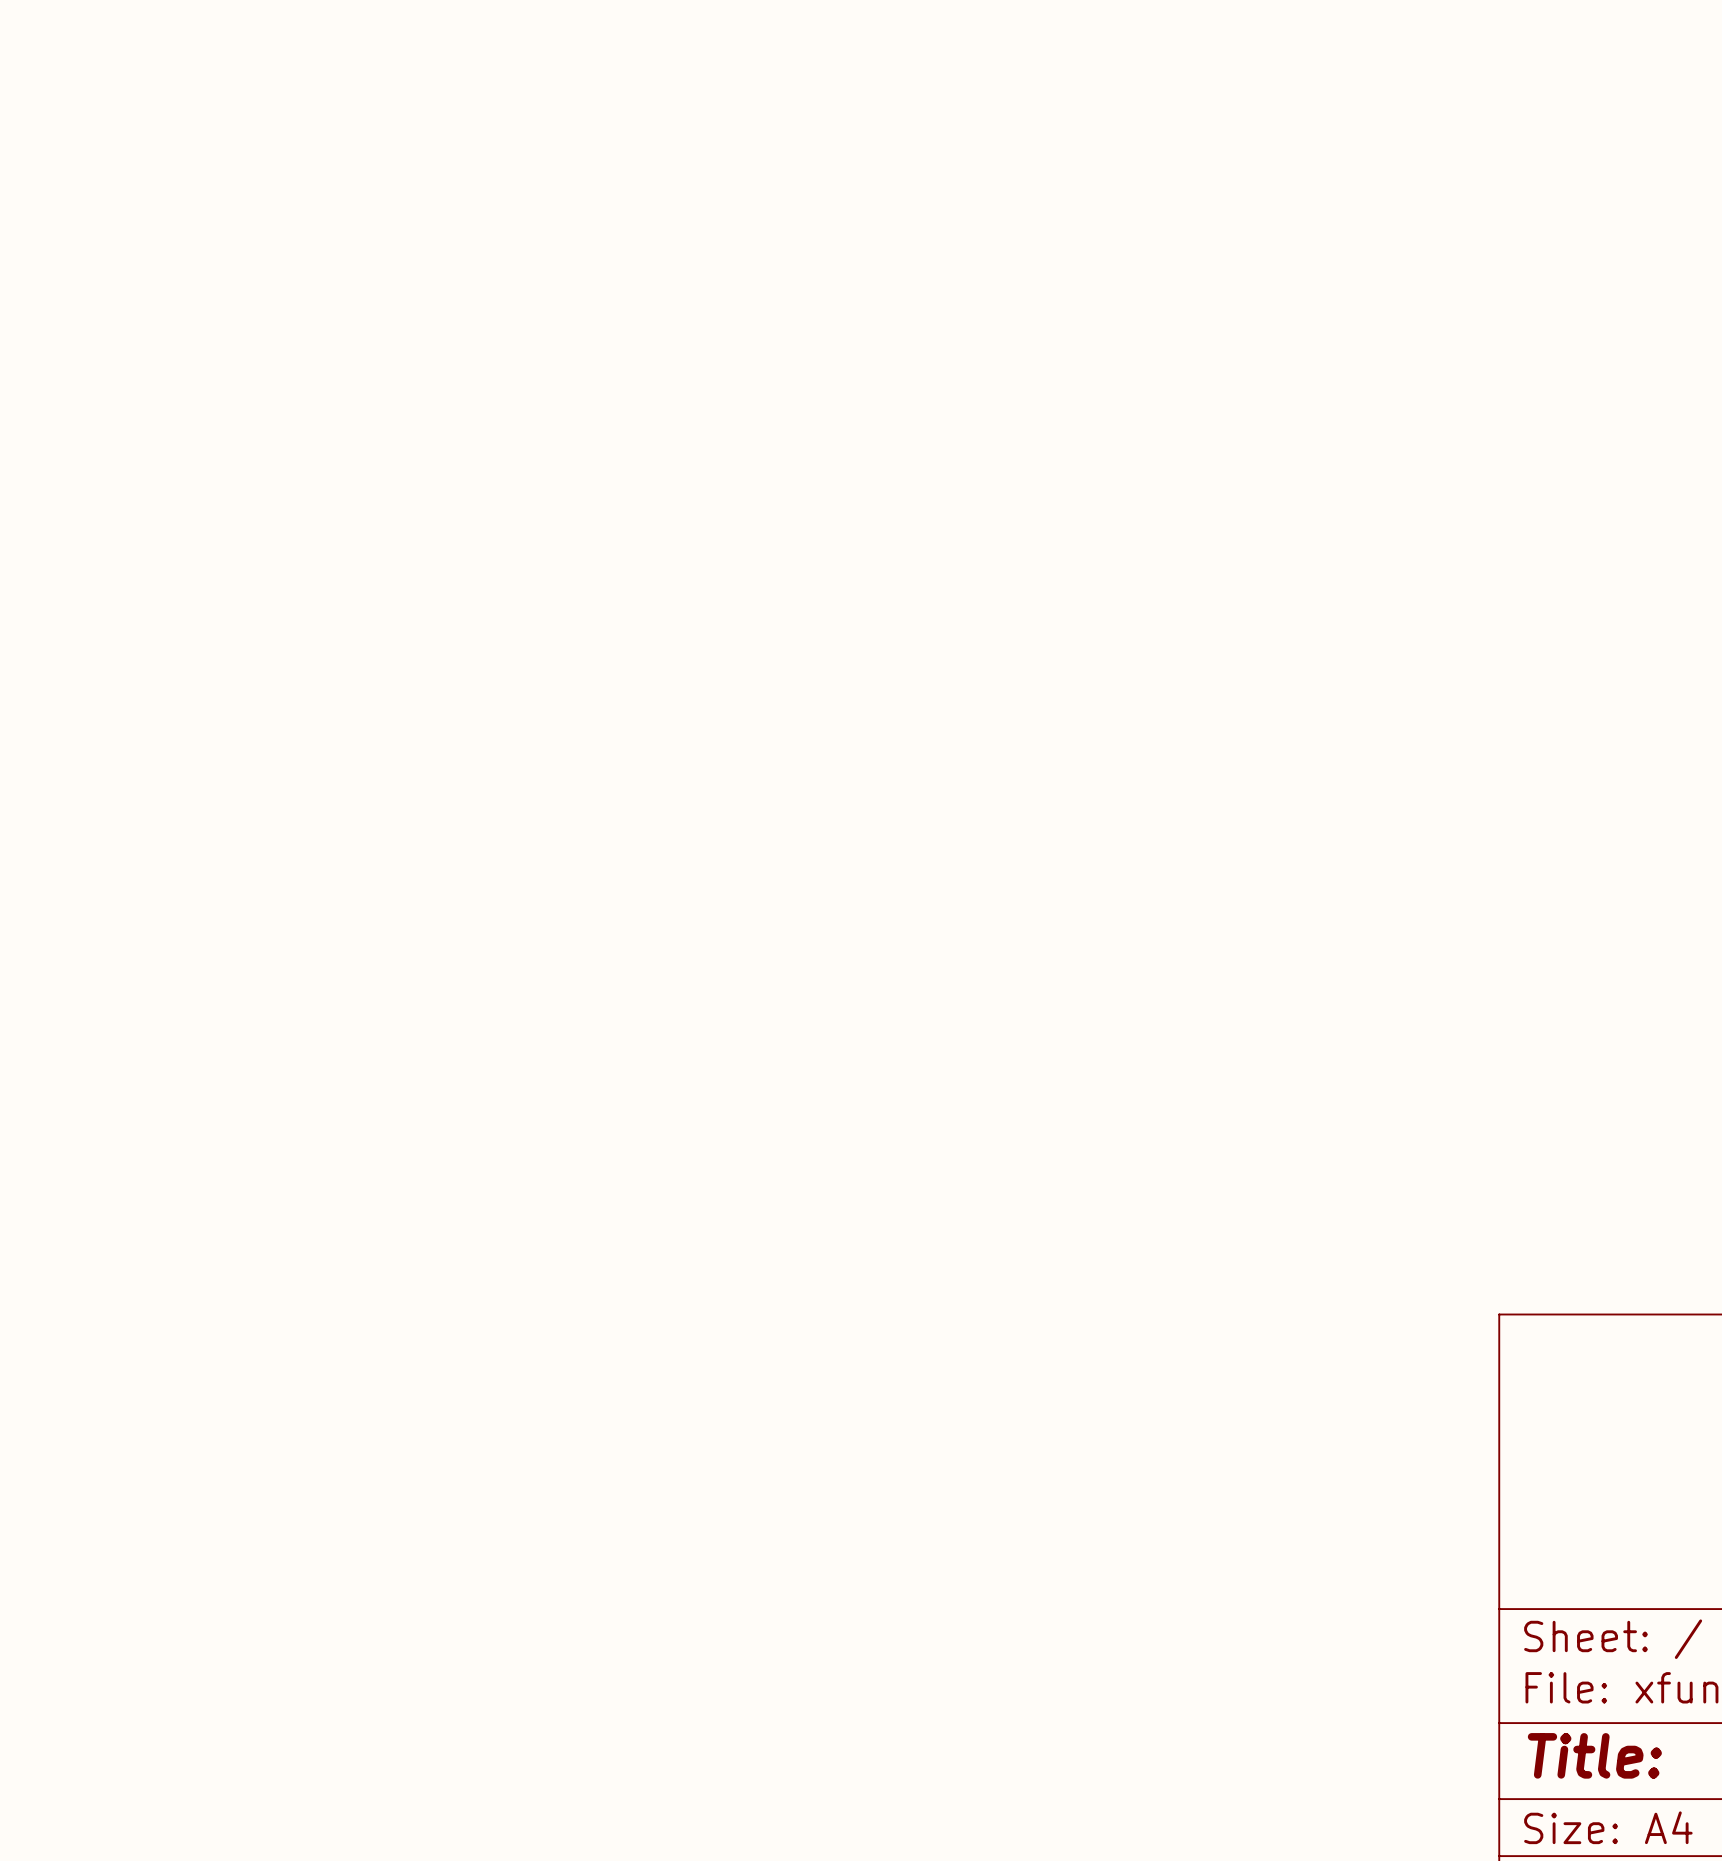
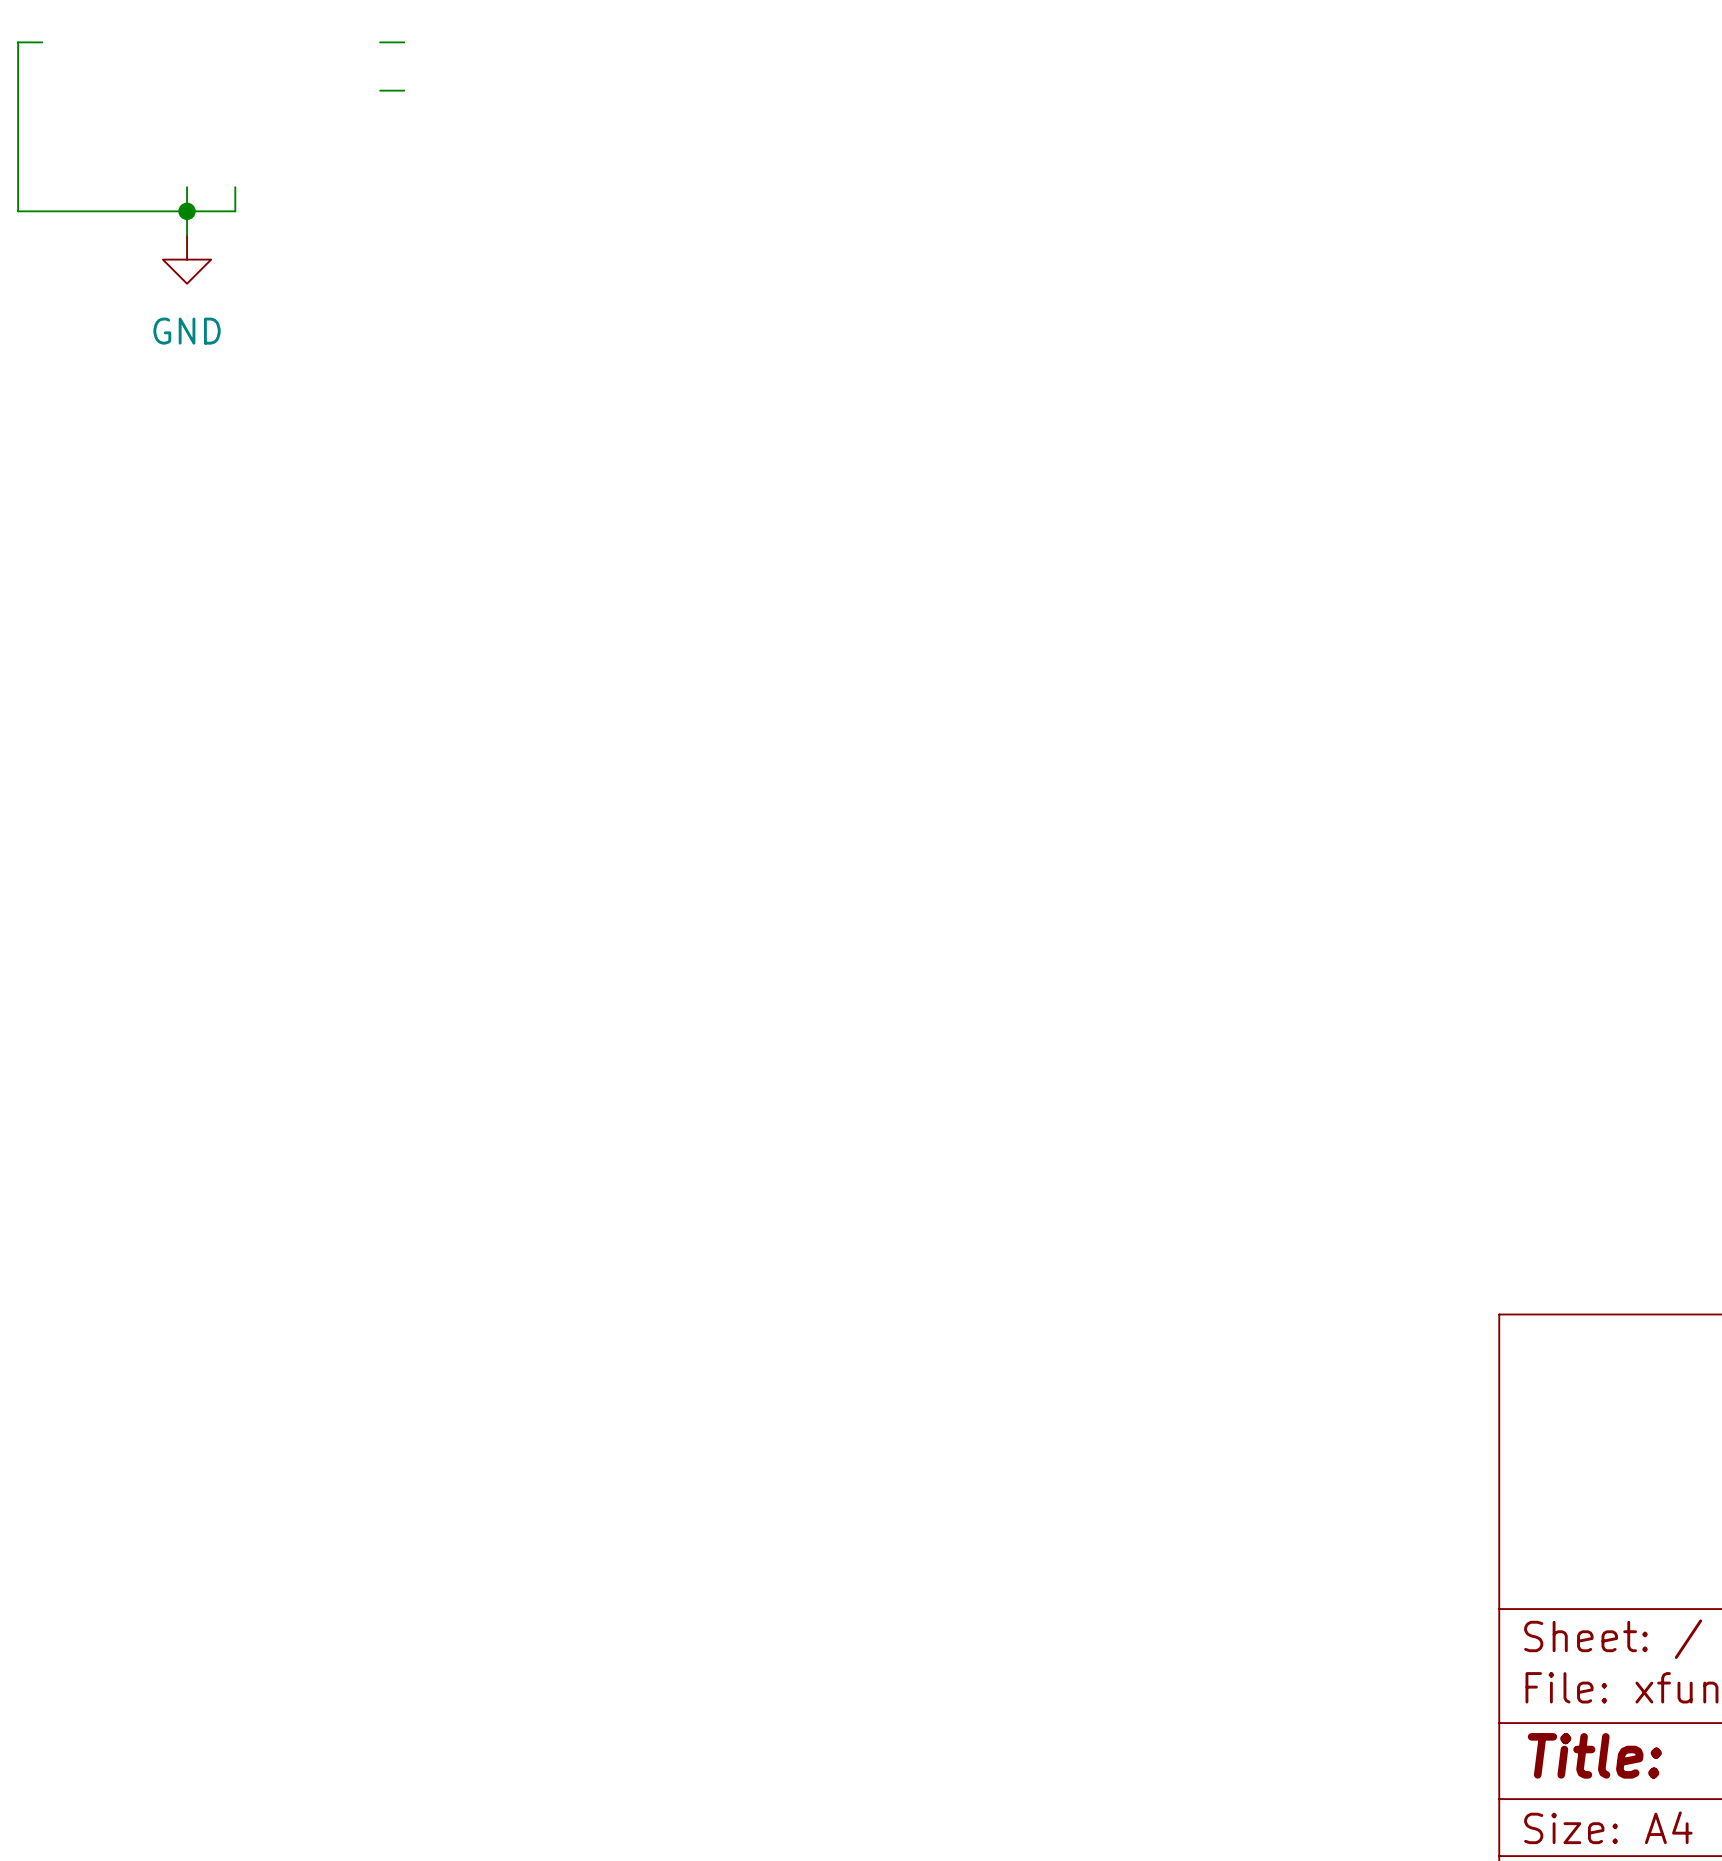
wire: none -> (42, 42) (18, 42) (18, 211) (235, 211) (235, 187)
wire: none -> (380, 42) (404, 42)
wire: none -> (380, 90) (404, 90)
wire: none -> (187, 187) (187, 235)
junction: none -> (187, 211)
power symbol: none -> GND (187, 259)

